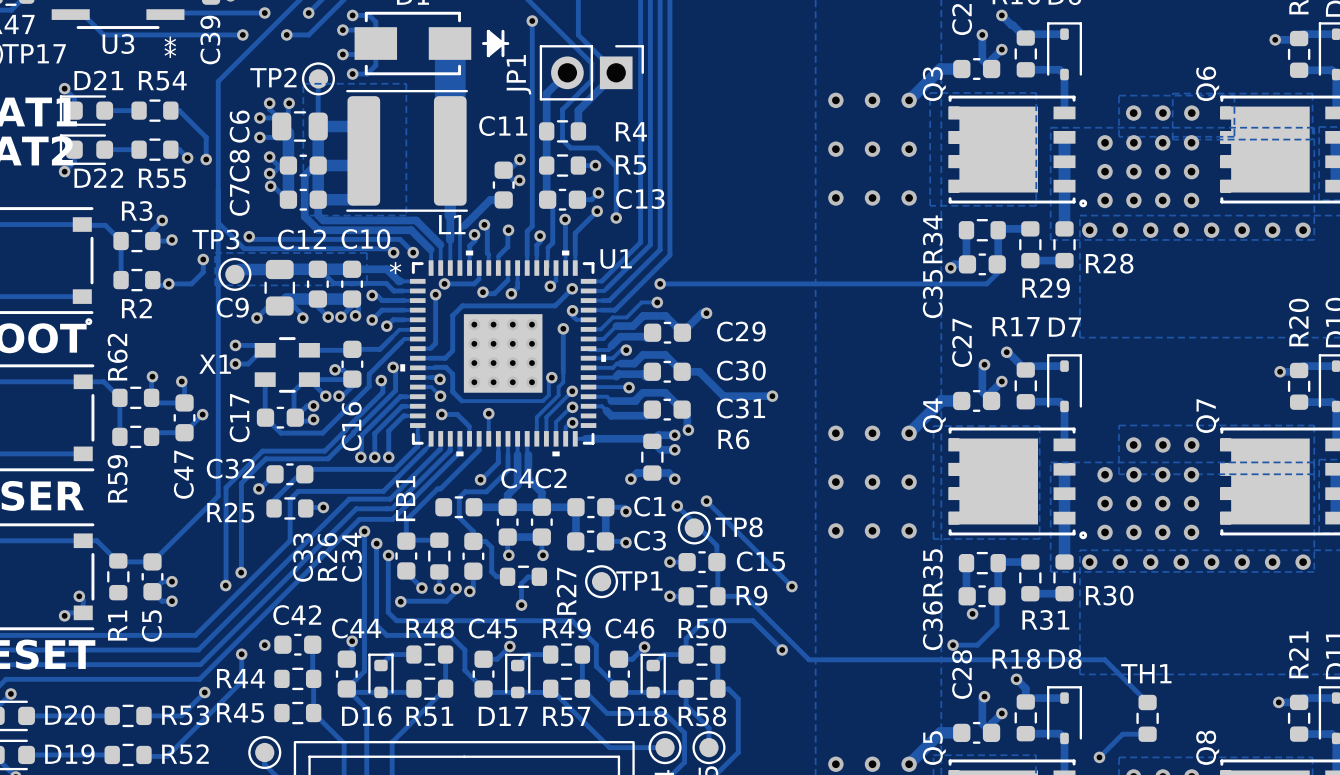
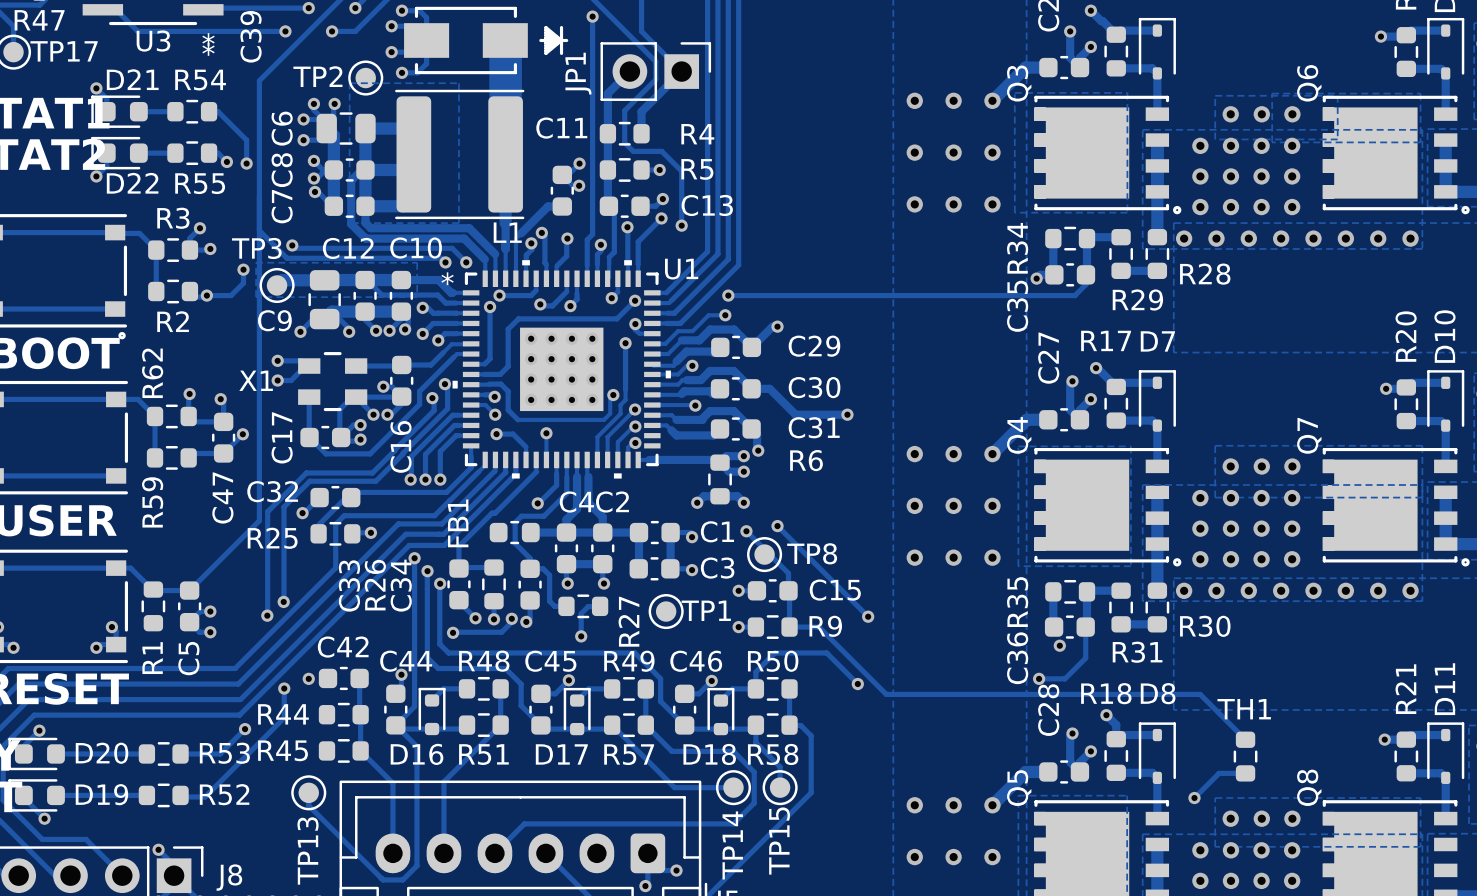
track: (318, 79) (318, 126) -> none

